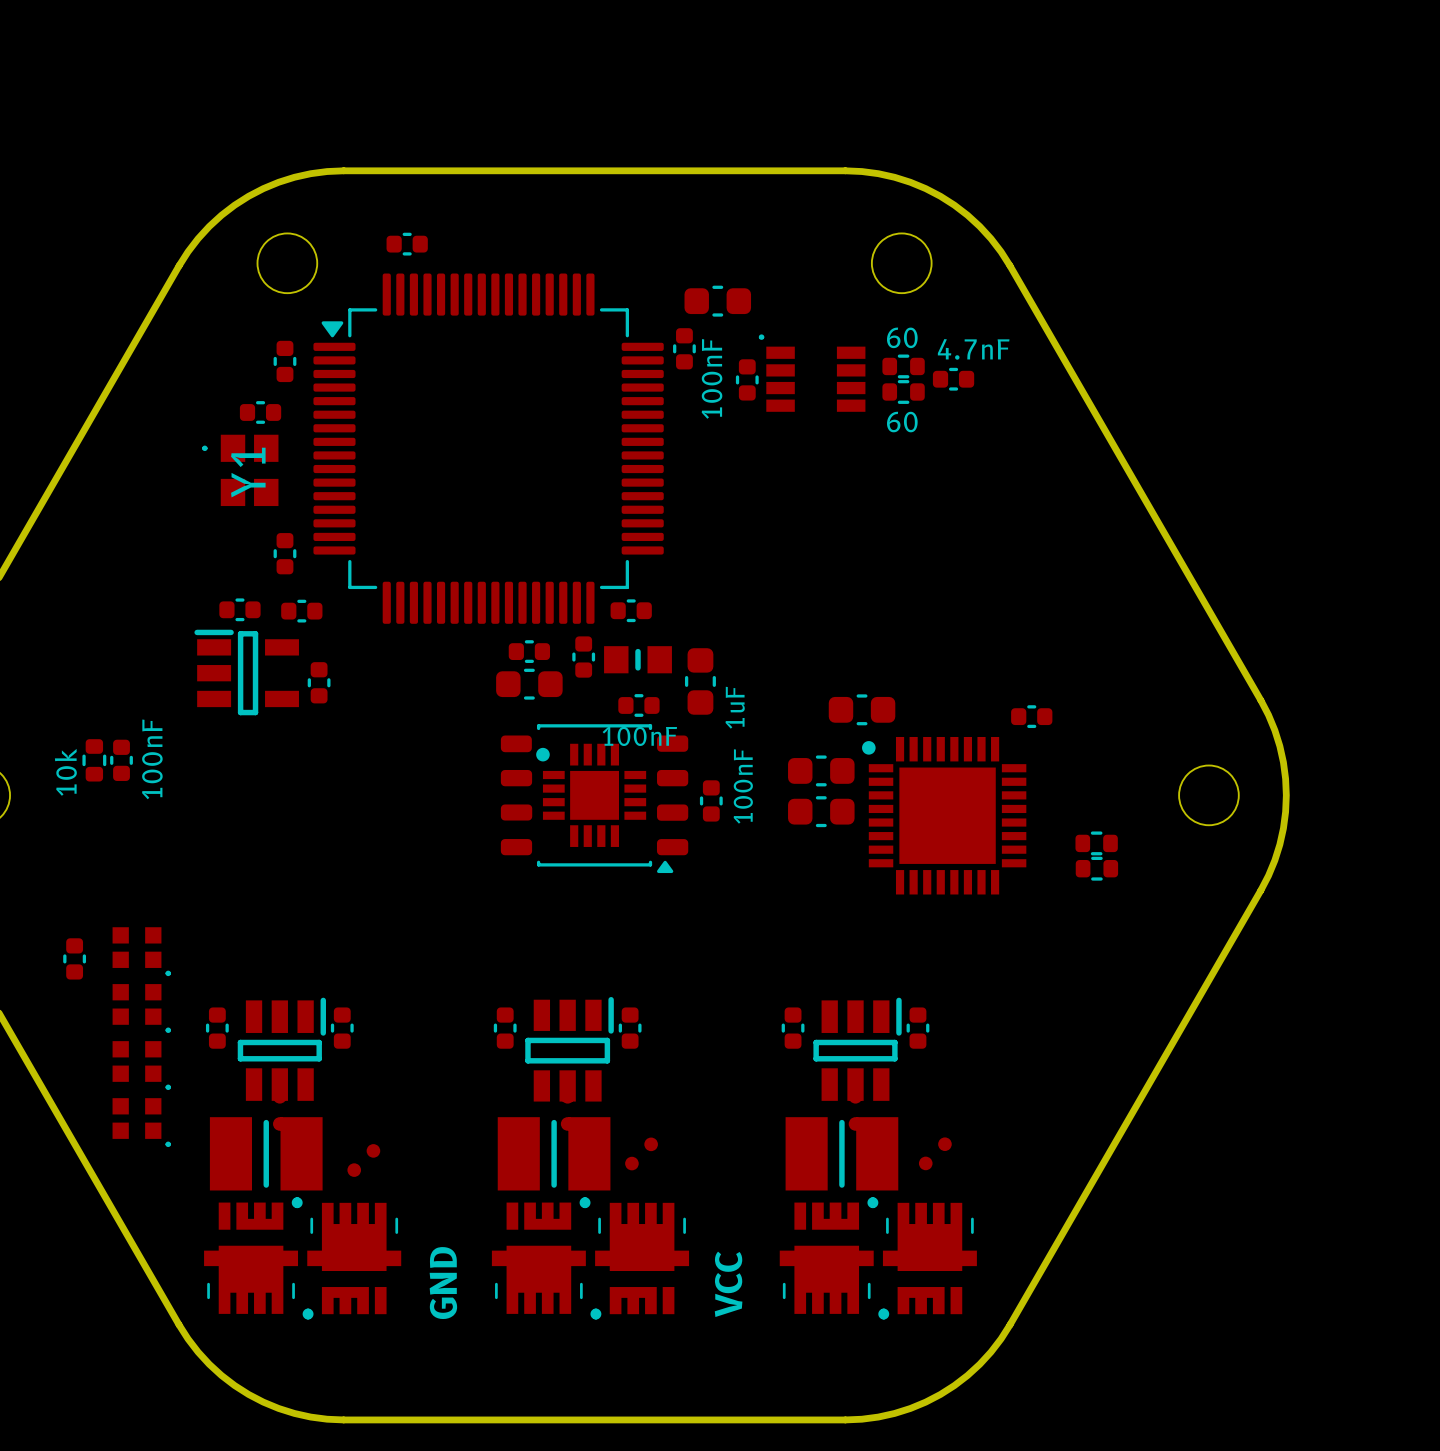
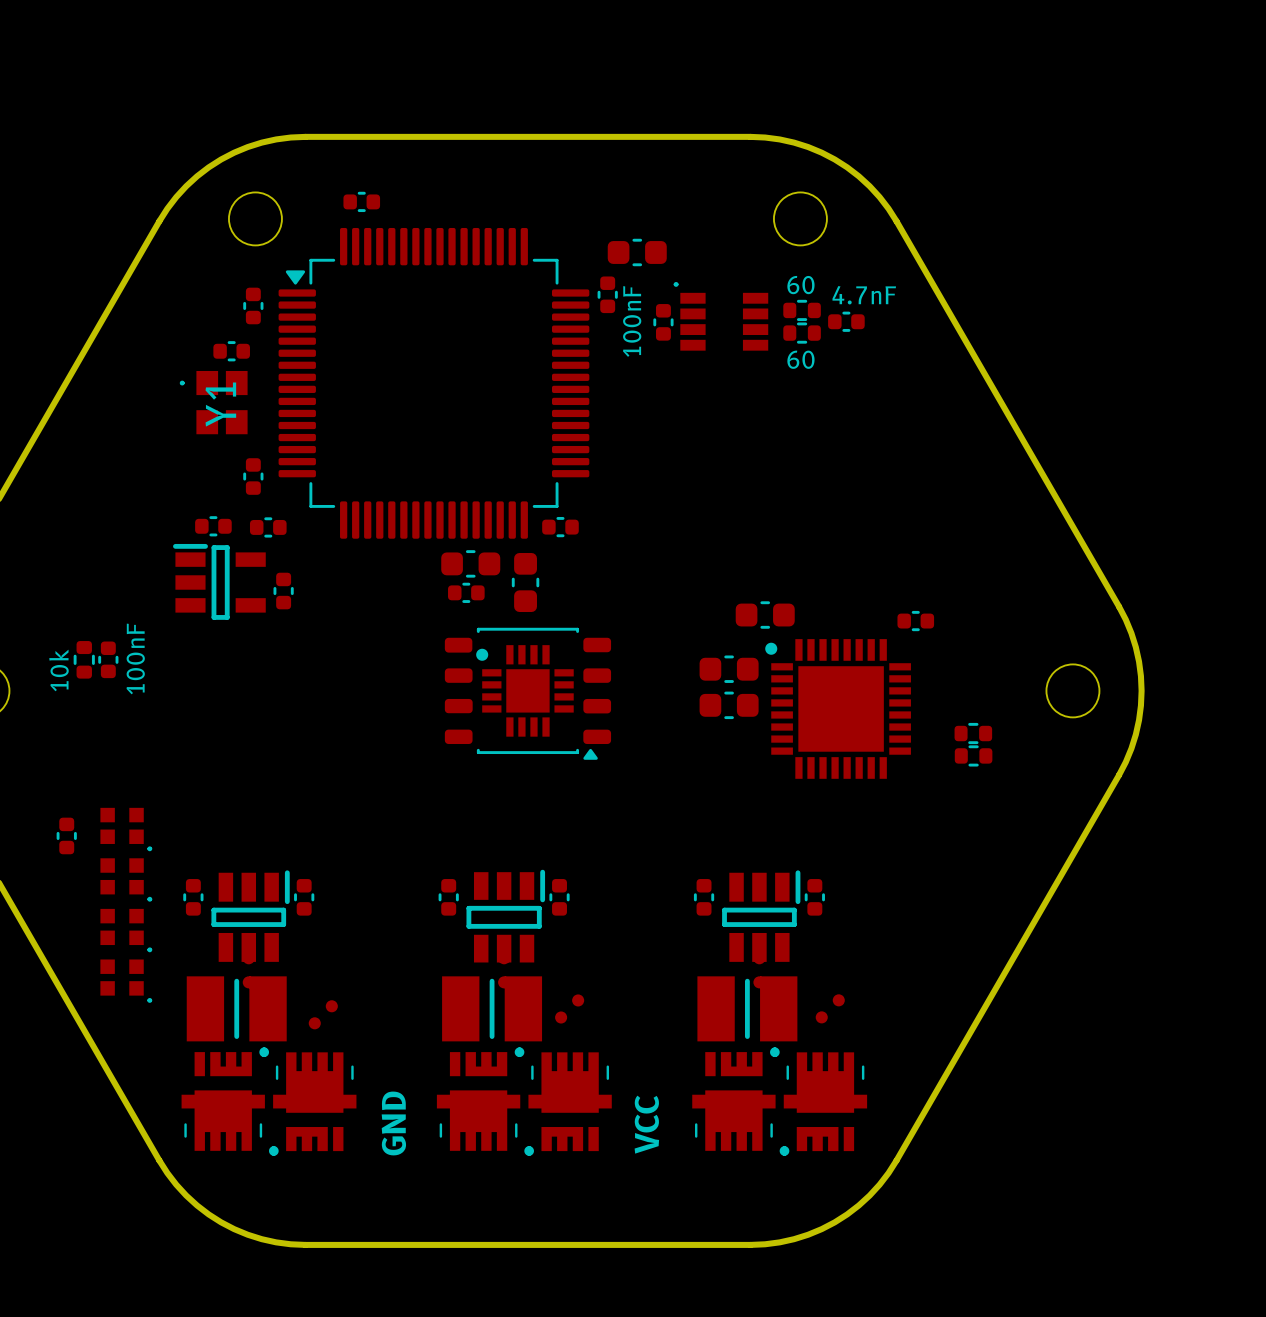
part footprint: [572, 636, 596, 678] -> [511, 552, 540, 613]
part footprint: [508, 640, 551, 663] -> [441, 550, 501, 578]
part: (638, 659) -> none
part footprint: [496, 668, 563, 700] -> [448, 582, 485, 603]
part: 1uF (700, 681) -> none
part: 100nF (638, 705) -> none
part: 100nF (711, 800) -> none

